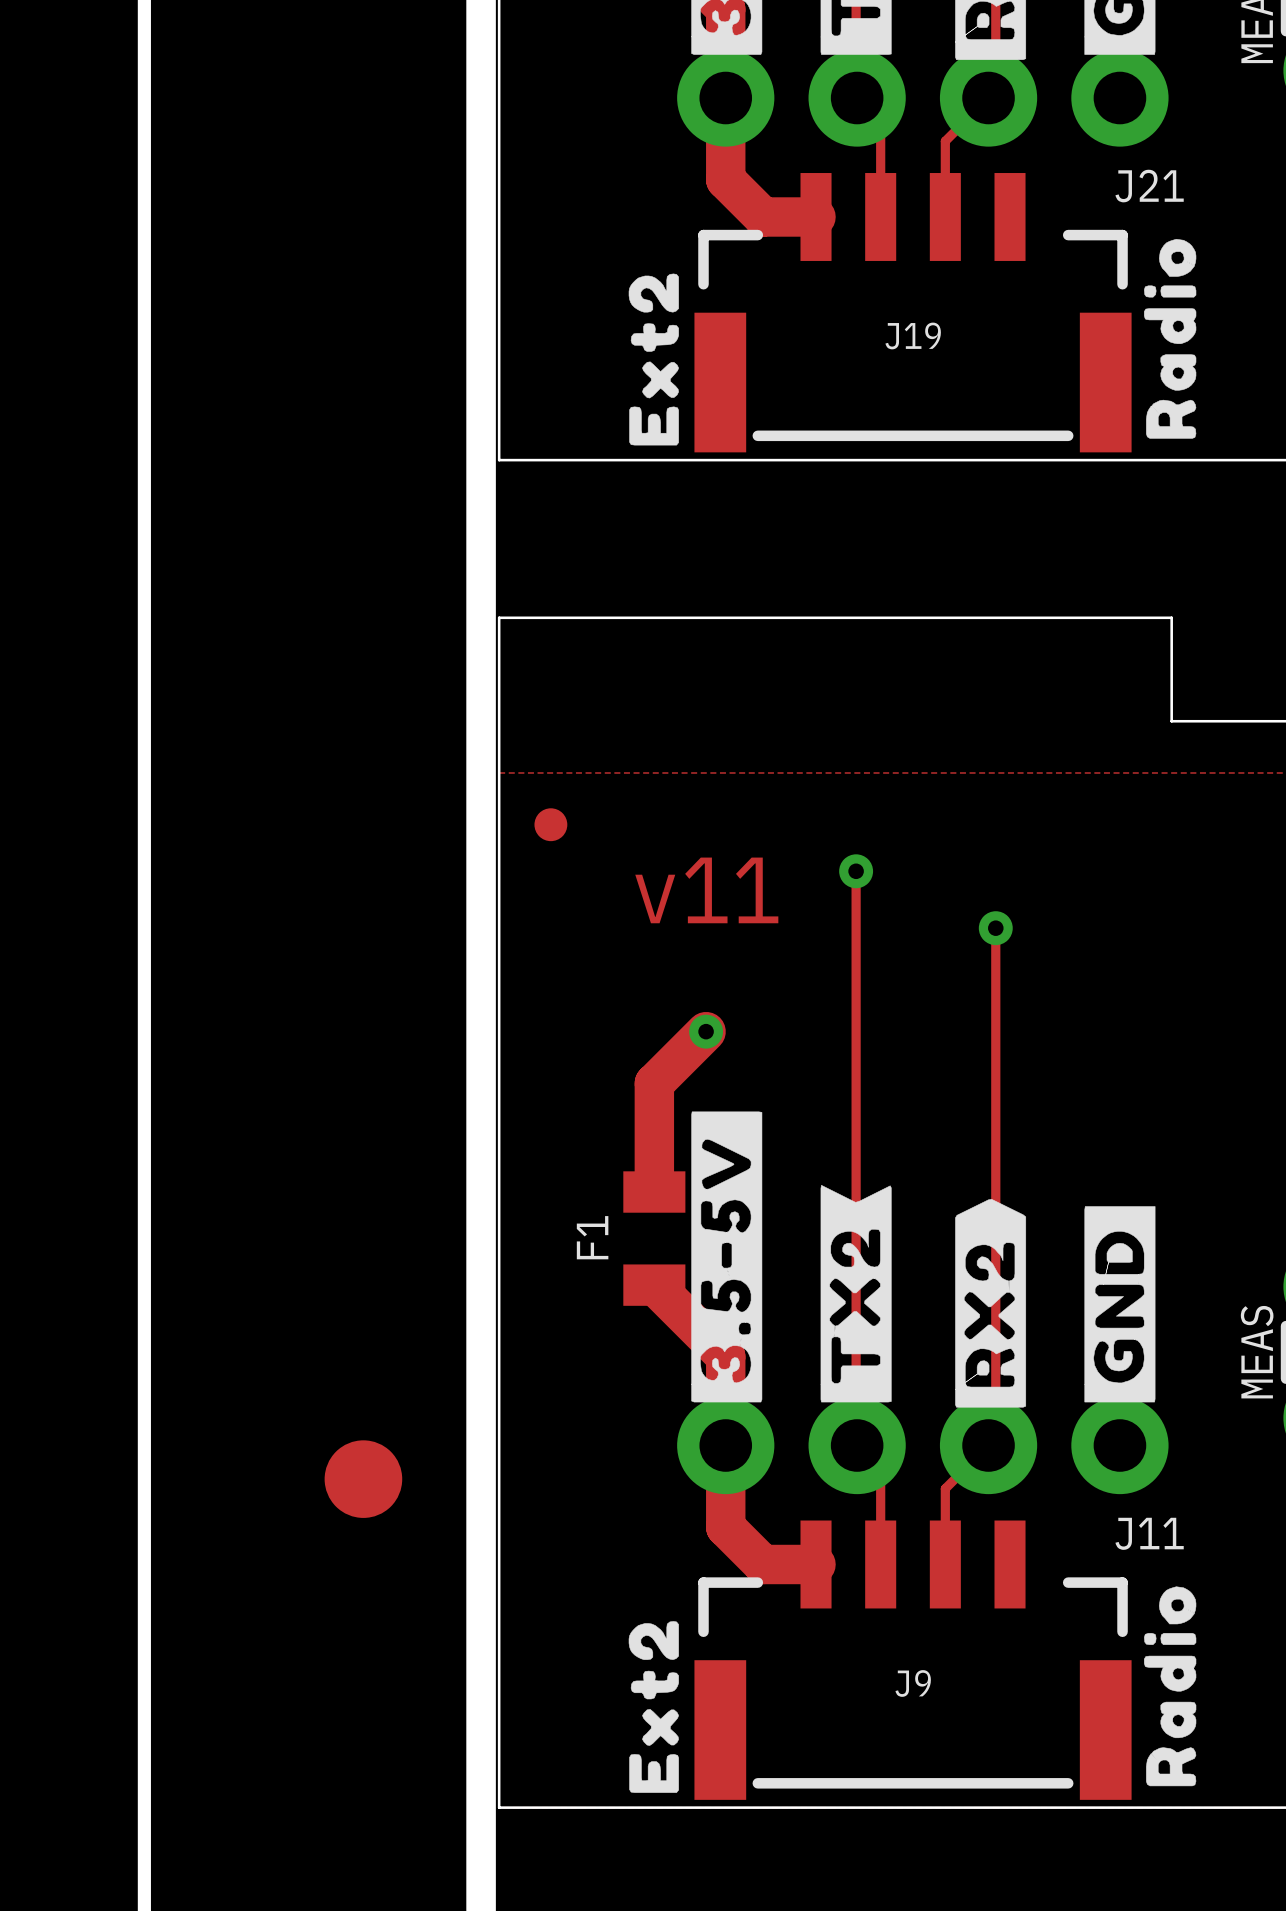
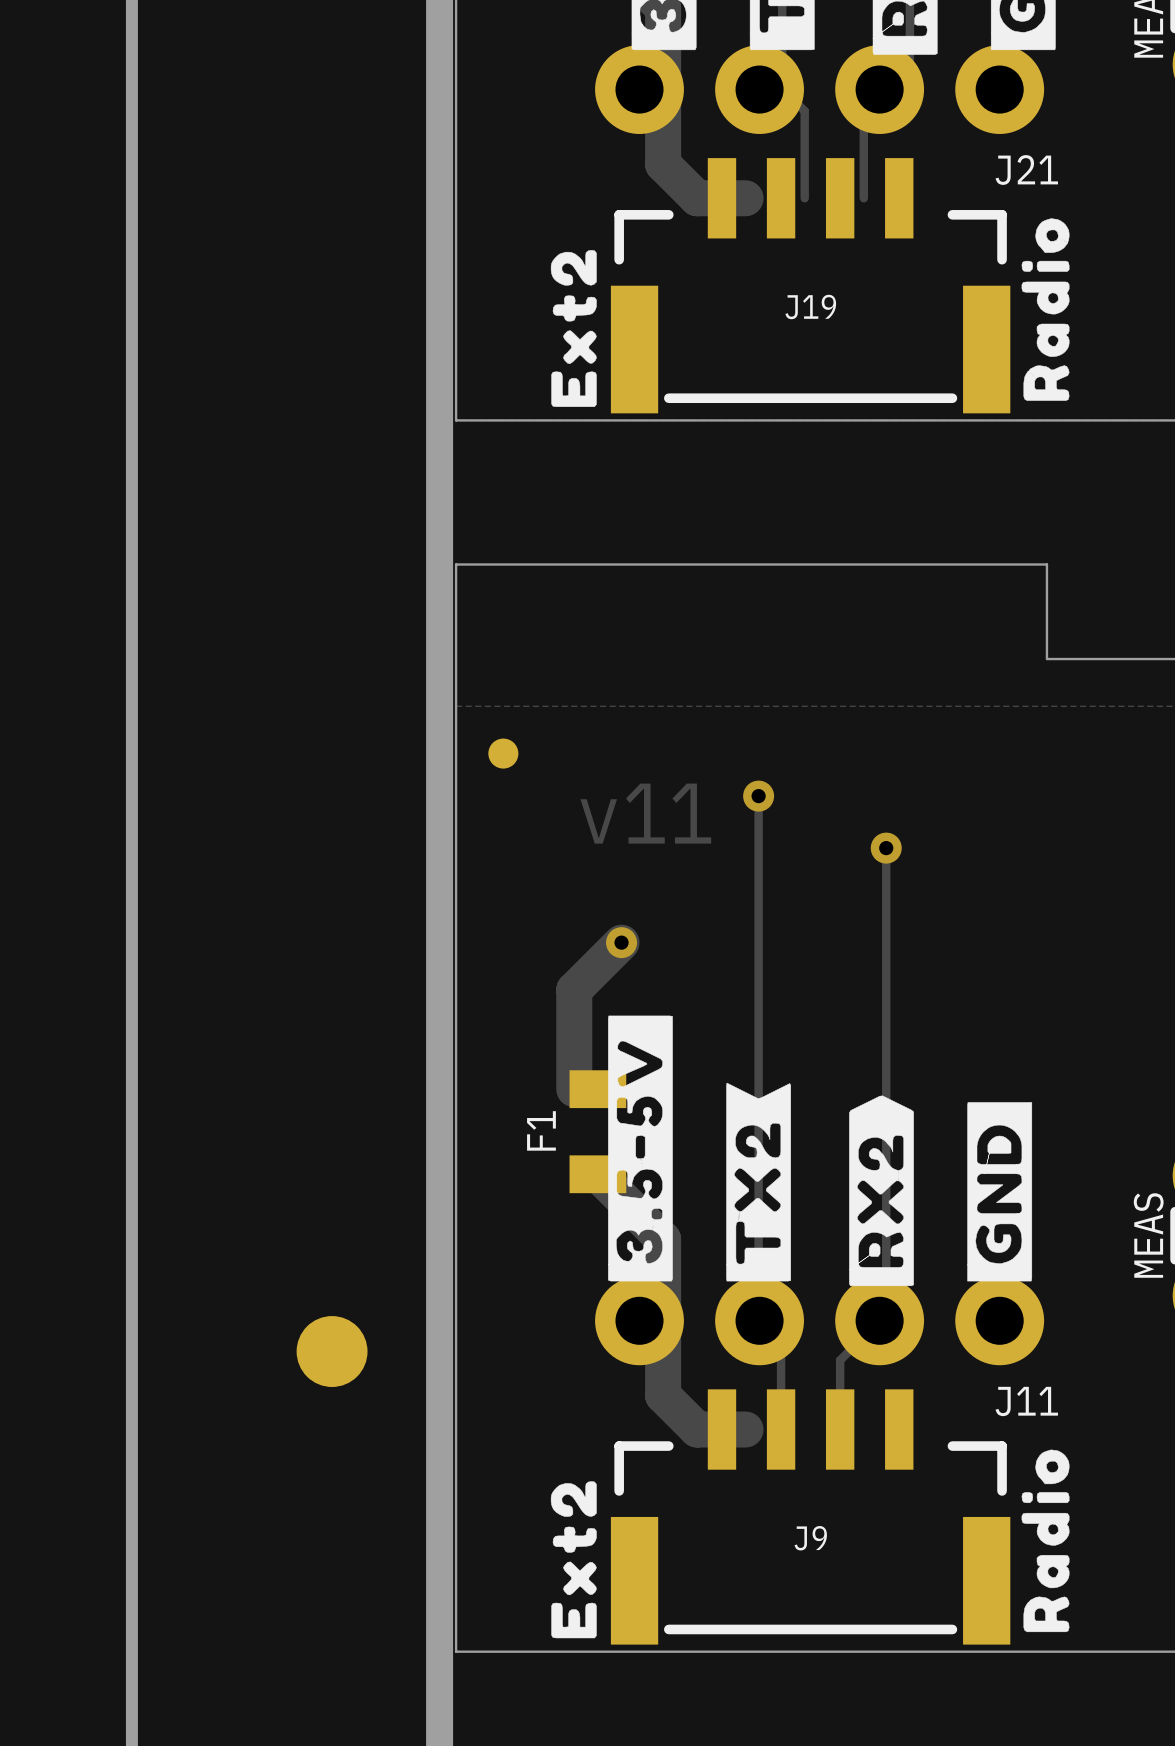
J21 position: (922, 98) -> (819, 89)
J19 position: (913, 312) -> (810, 285)
drawing position: (1170, 338) -> (1045, 309)
drawing position: (653, 359) -> (573, 328)
board edge: (1145, 617) (1171, 617) (1171, 721) -> (1046, 564) (1046, 659) (1070, 659)
track: (856, 871) (856, 1444) (880, 1469) (880, 1564) -> (758, 796) (758, 1319) (781, 1342) (781, 1429)
via position: (856, 871) -> (758, 796)
track: (995, 928) (995, 1438) (945, 1488) (945, 1564) -> (886, 848) (886, 1314) (840, 1360) (840, 1429)
via position: (995, 928) -> (886, 848)
track: (706, 1031) (654, 1083) (654, 1192) -> (621, 942) (574, 989) (574, 1089)
via position: (706, 1031) -> (621, 942)
drawing position: (726, 1256) -> (640, 1148)
drawing position: (856, 1293) -> (758, 1182)
drawing position: (990, 1303) -> (881, 1190)
drawing position: (1119, 1304) -> (999, 1191)
J11 position: (922, 1445) -> (819, 1320)
J9 position: (913, 1660) -> (810, 1516)
drawing position: (1170, 1686) -> (1045, 1540)
drawing position: (653, 1707) -> (573, 1559)

